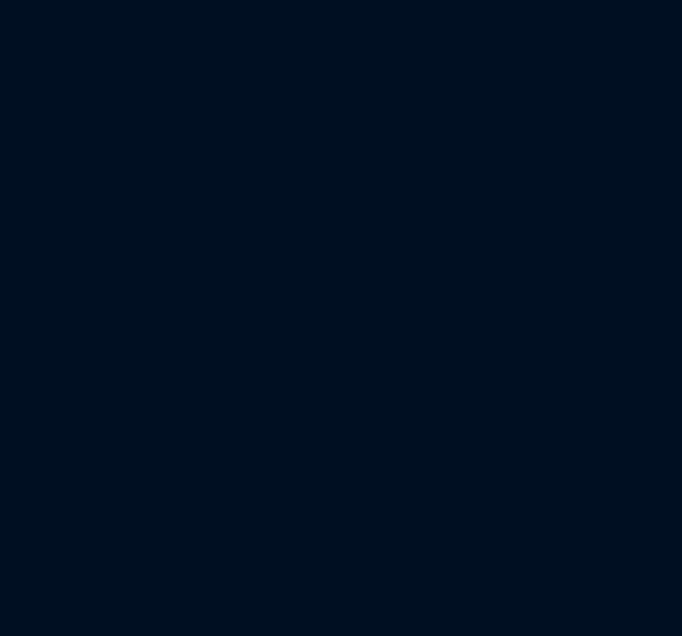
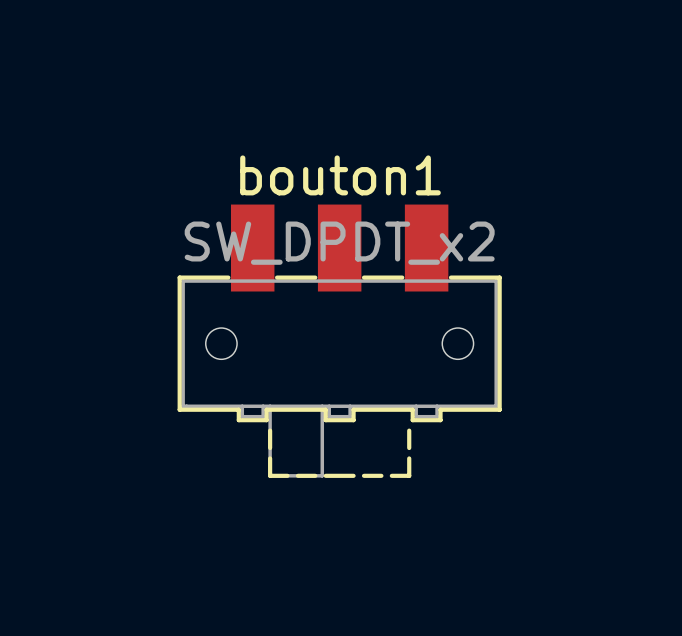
bouton1: none -> SW_DPDT_x2 (339, 341)

